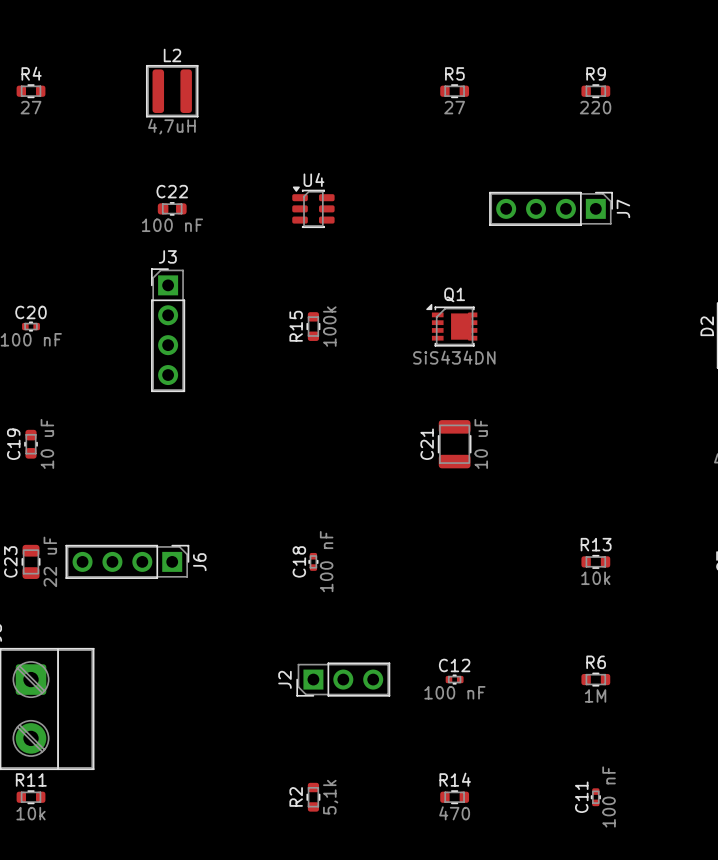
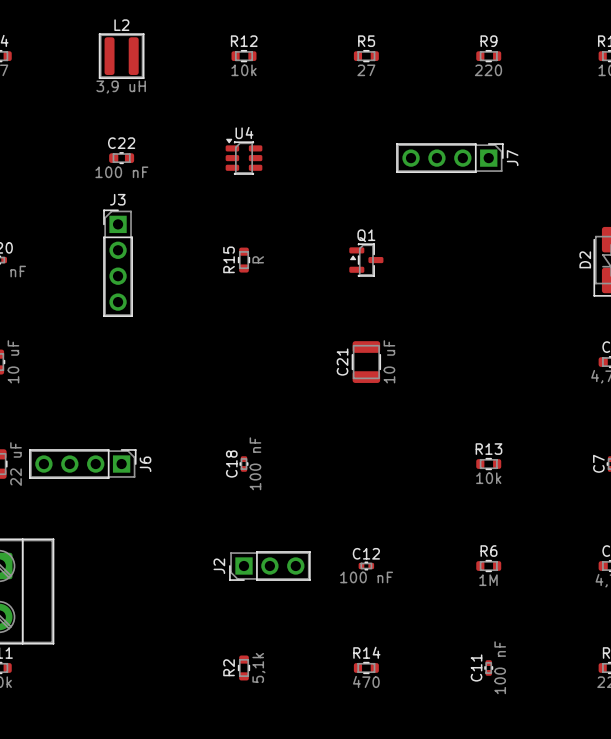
R12: none -> 10k (243, 56)
L2 value: 4,7uH (171, 126) -> 3,9 uH (121, 87)
Q1 footprint: [426, 303, 478, 347] -> [349, 243, 384, 277]
R15 value: 100k (329, 326) -> R (258, 259)
Q1 value: SiS434DN (454, 357) -> none

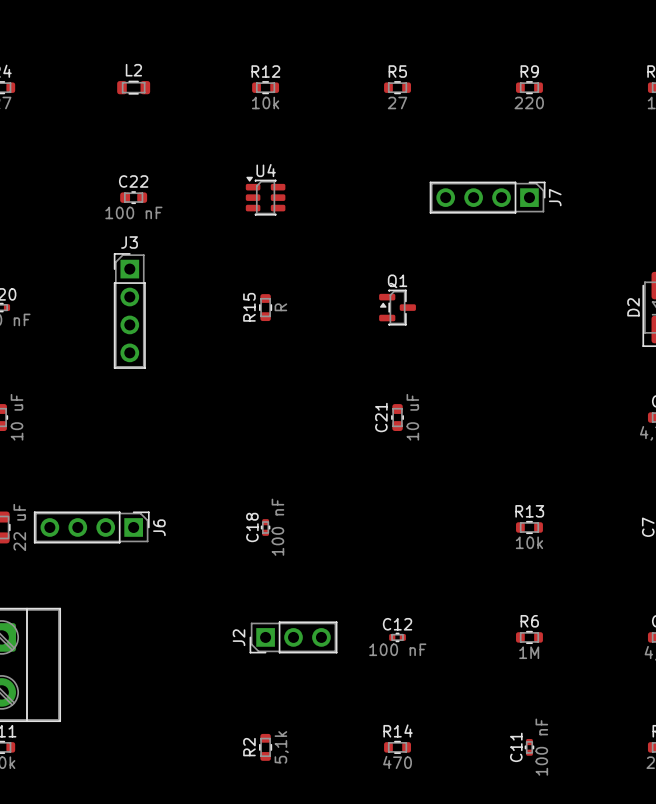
L2 footprint: [98, 33, 145, 79] -> [117, 80, 151, 95]
L2 value: 3,9 uH (121, 87) -> none
C21 footprint: [351, 341, 381, 383] -> [391, 404, 404, 431]

